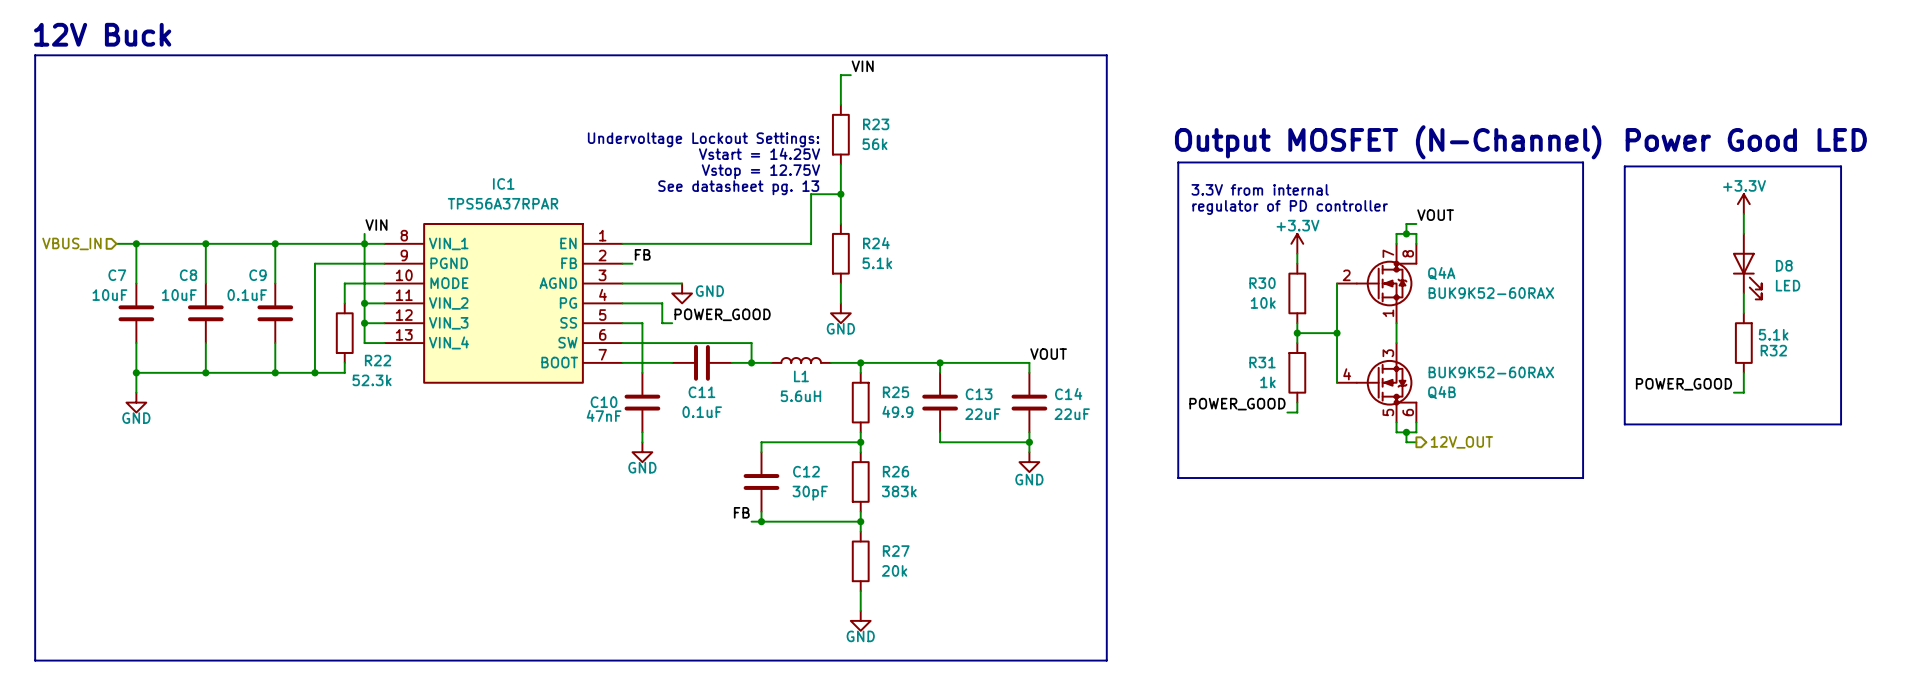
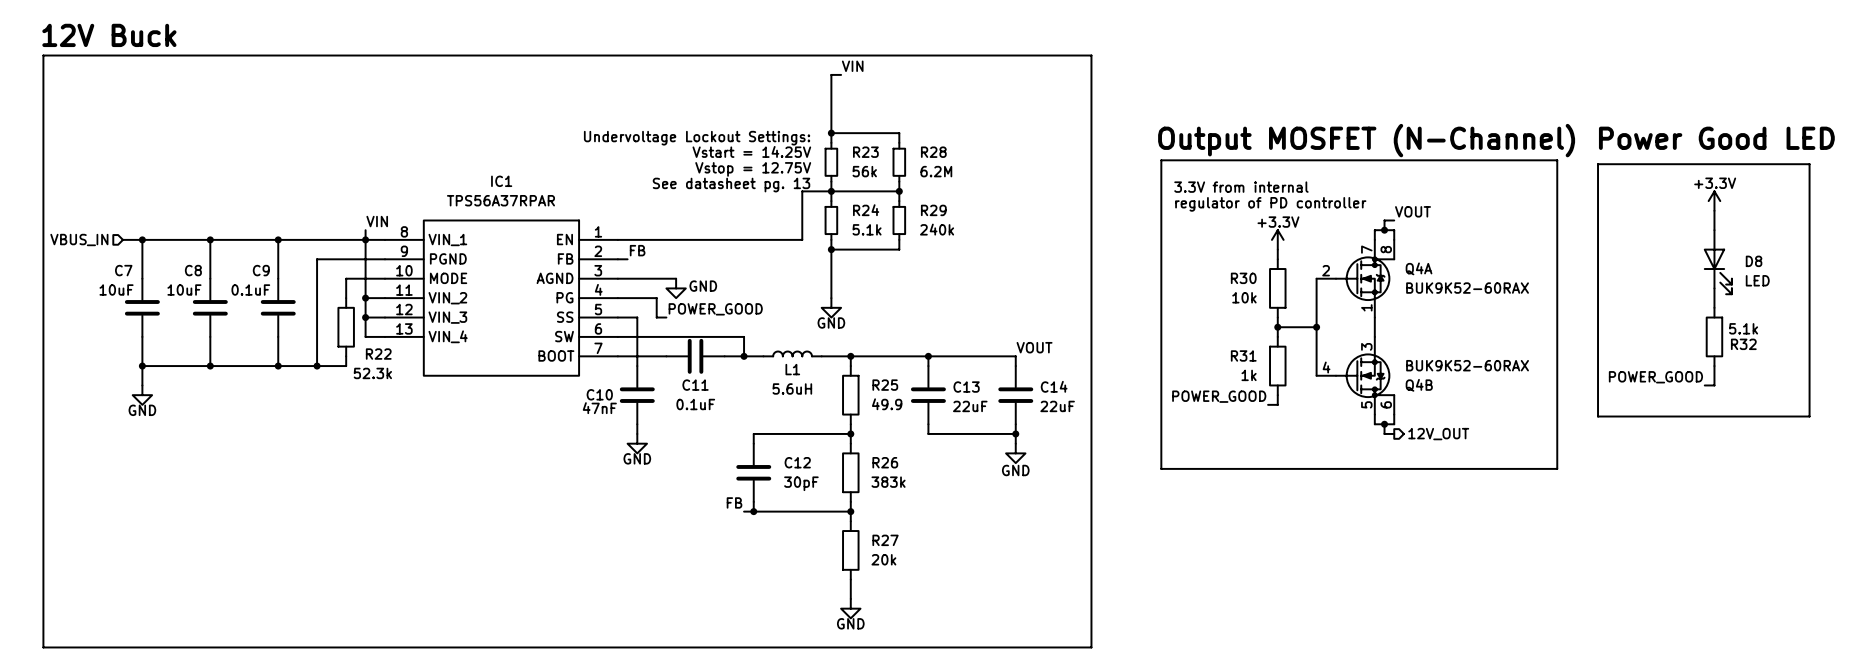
R23 symbol: [831, 104, 850, 165] -> [824, 142, 838, 182]
wire: none -> (831, 104) (831, 142)
wire: none -> (831, 133) (899, 133) (899, 142)
junction: none -> (831, 133)
wire: (840, 164) (840, 184) -> (899, 181) (899, 201)
R28: none -> 6.2M (899, 162)
wire: none -> (831, 191) (899, 191)
junction: none -> (899, 191)
wire: (840, 204) (840, 223) -> none
R24 symbol: [831, 223, 850, 284] -> [824, 201, 838, 240]
R29: none -> 240k (899, 220)
wire: none -> (831, 239) (831, 278)
wire: none -> (899, 239) (899, 249) (831, 249)
junction: none -> (831, 249)

